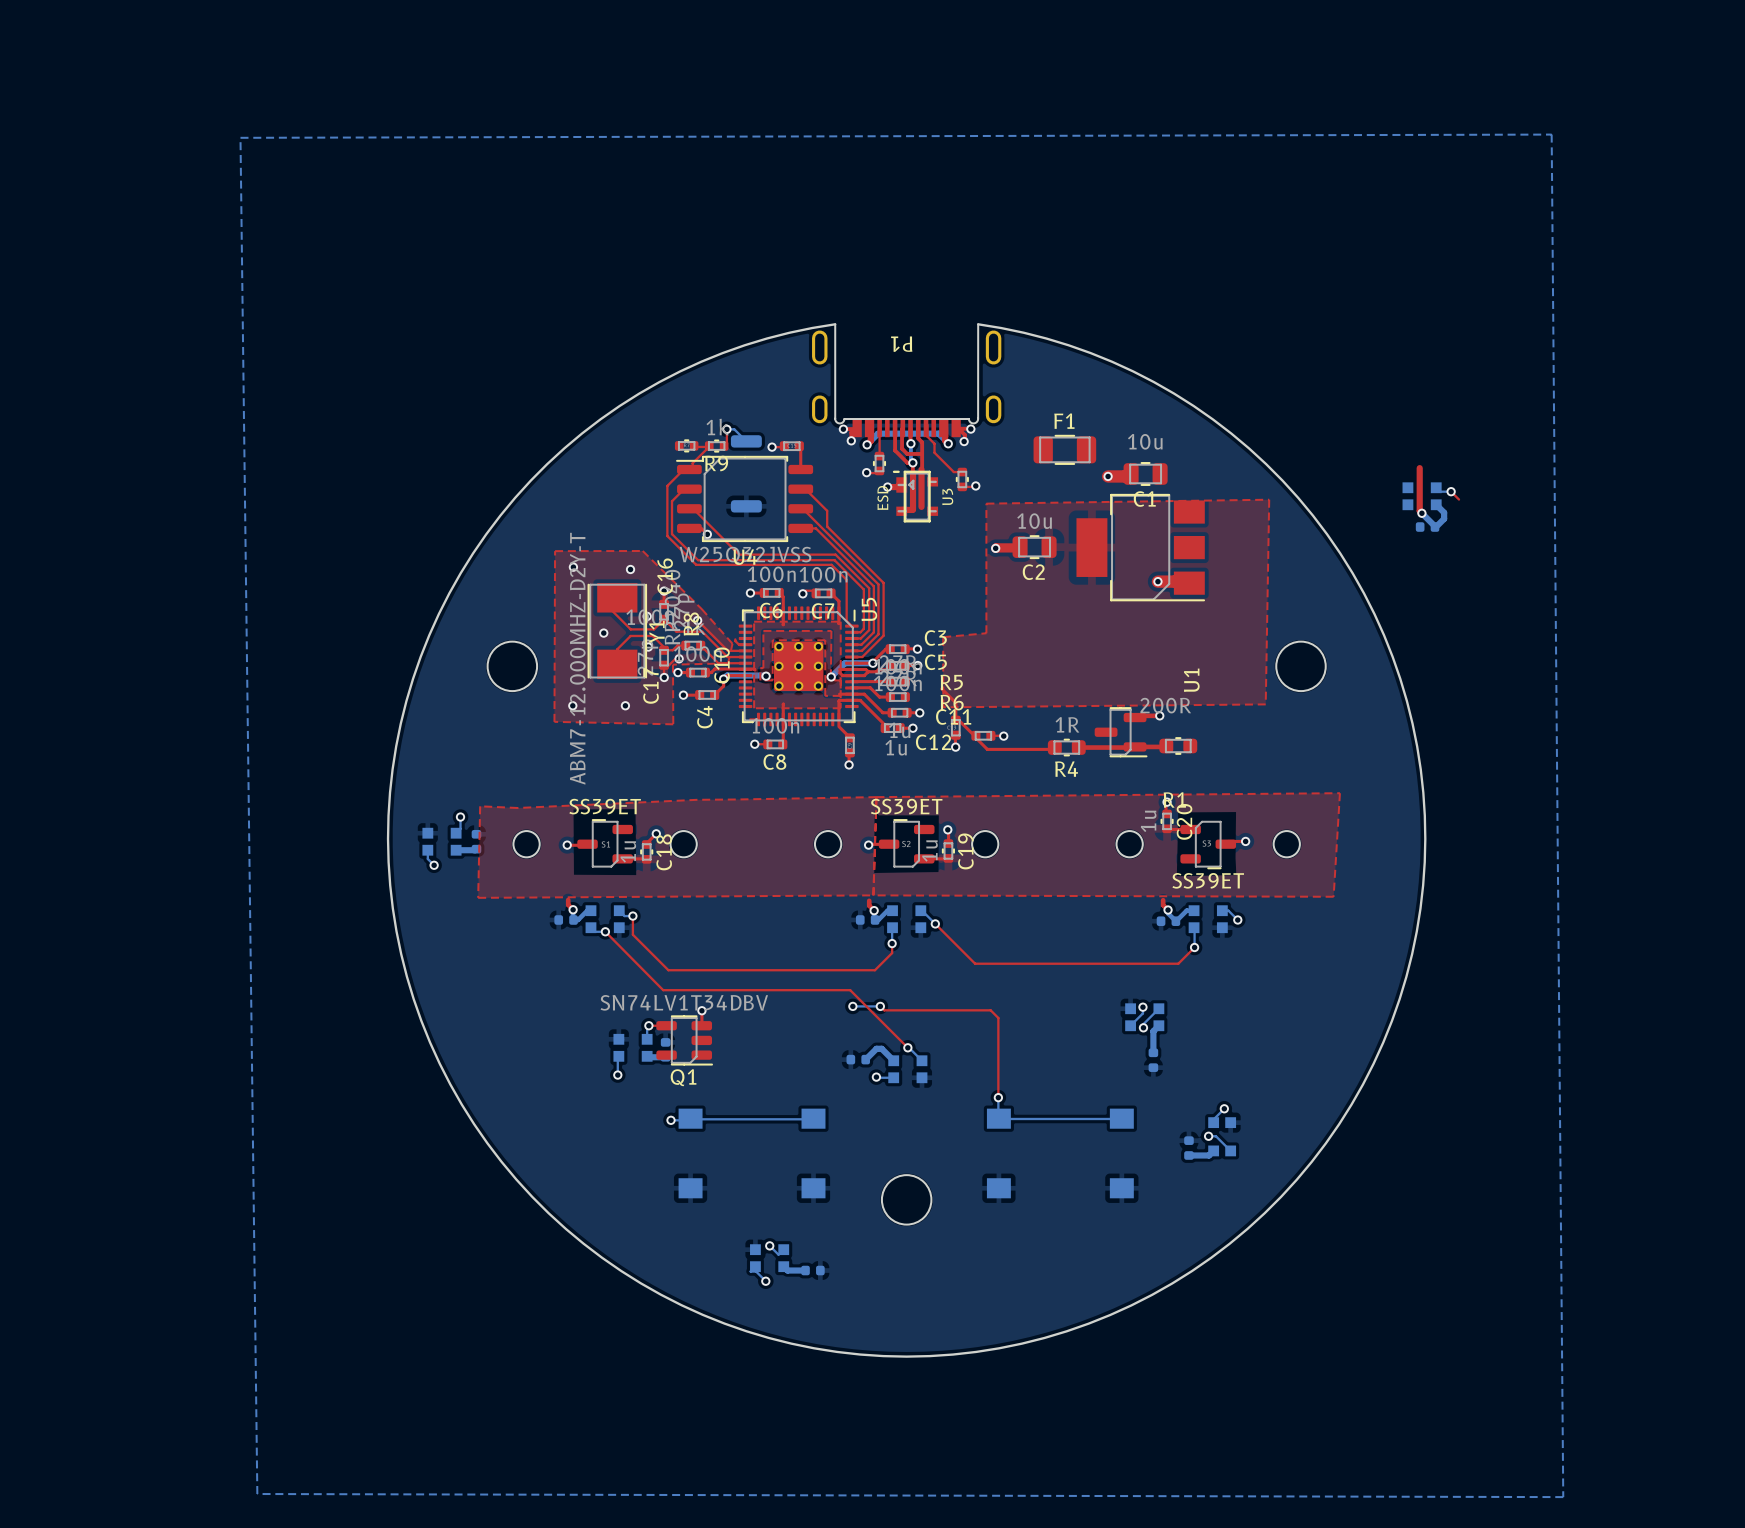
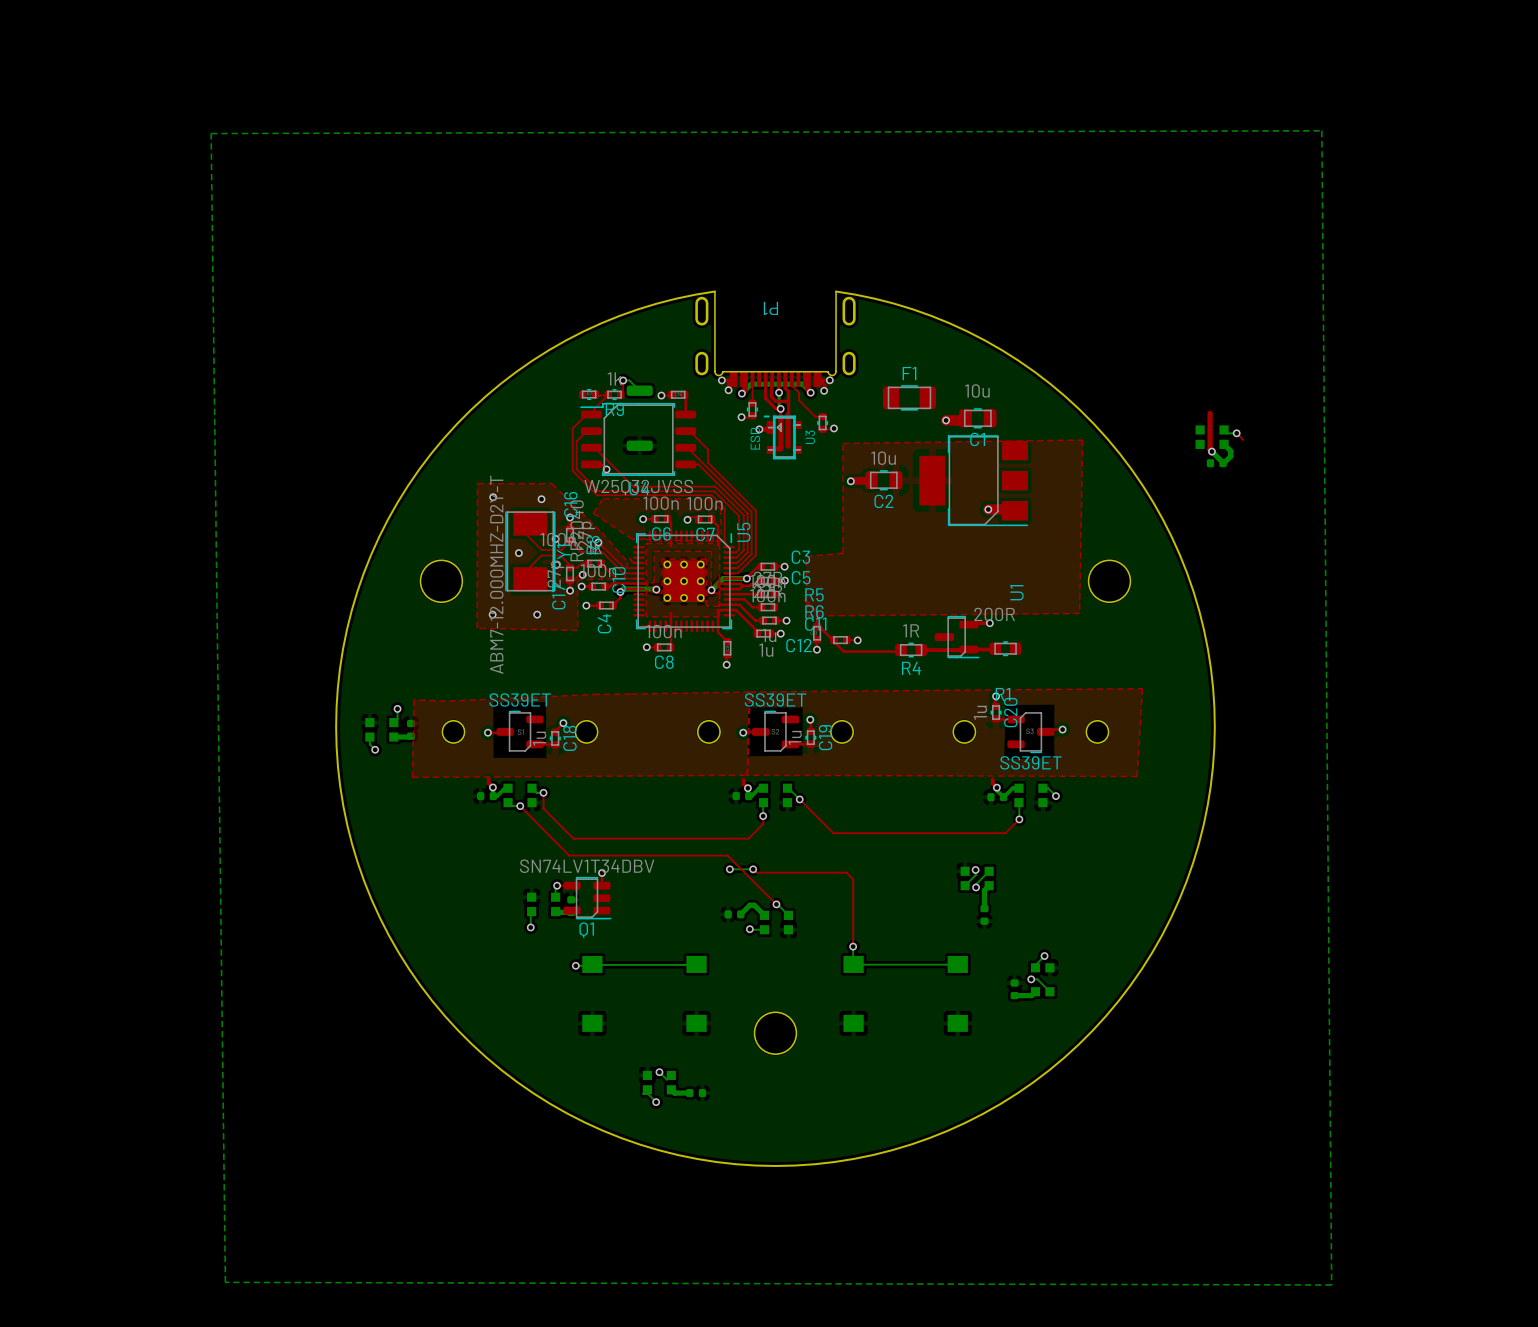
top zone outline: none -> (603, 498) (593, 513) (632, 539) (721, 541) (720, 508) (707, 498) (603, 498)

